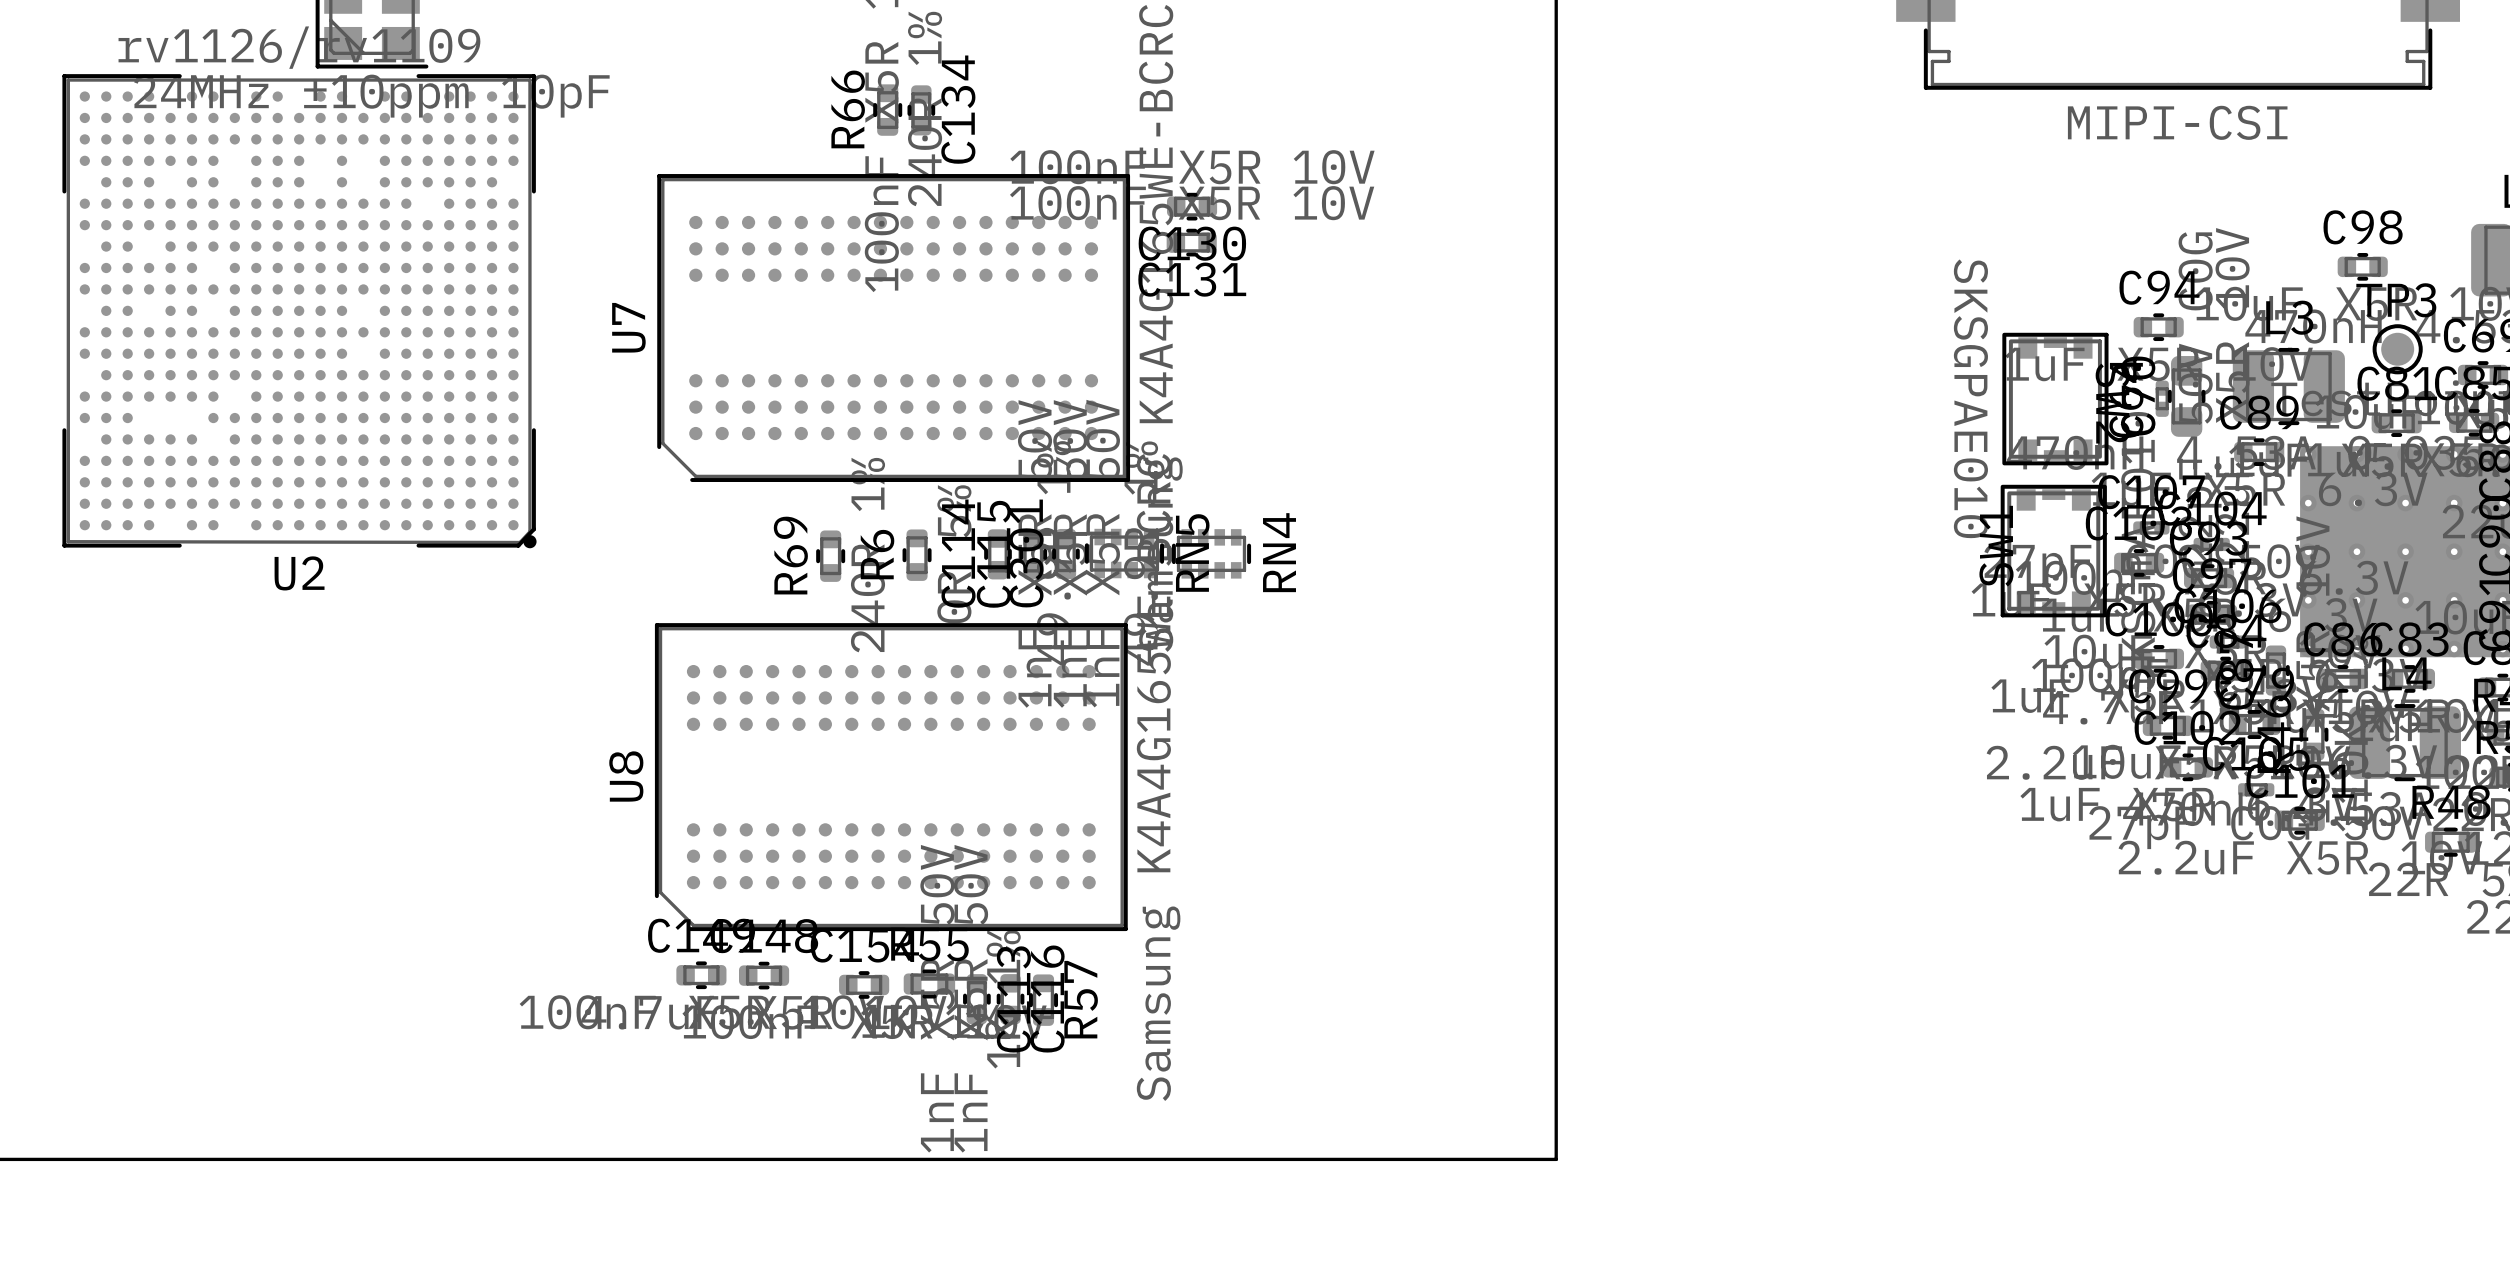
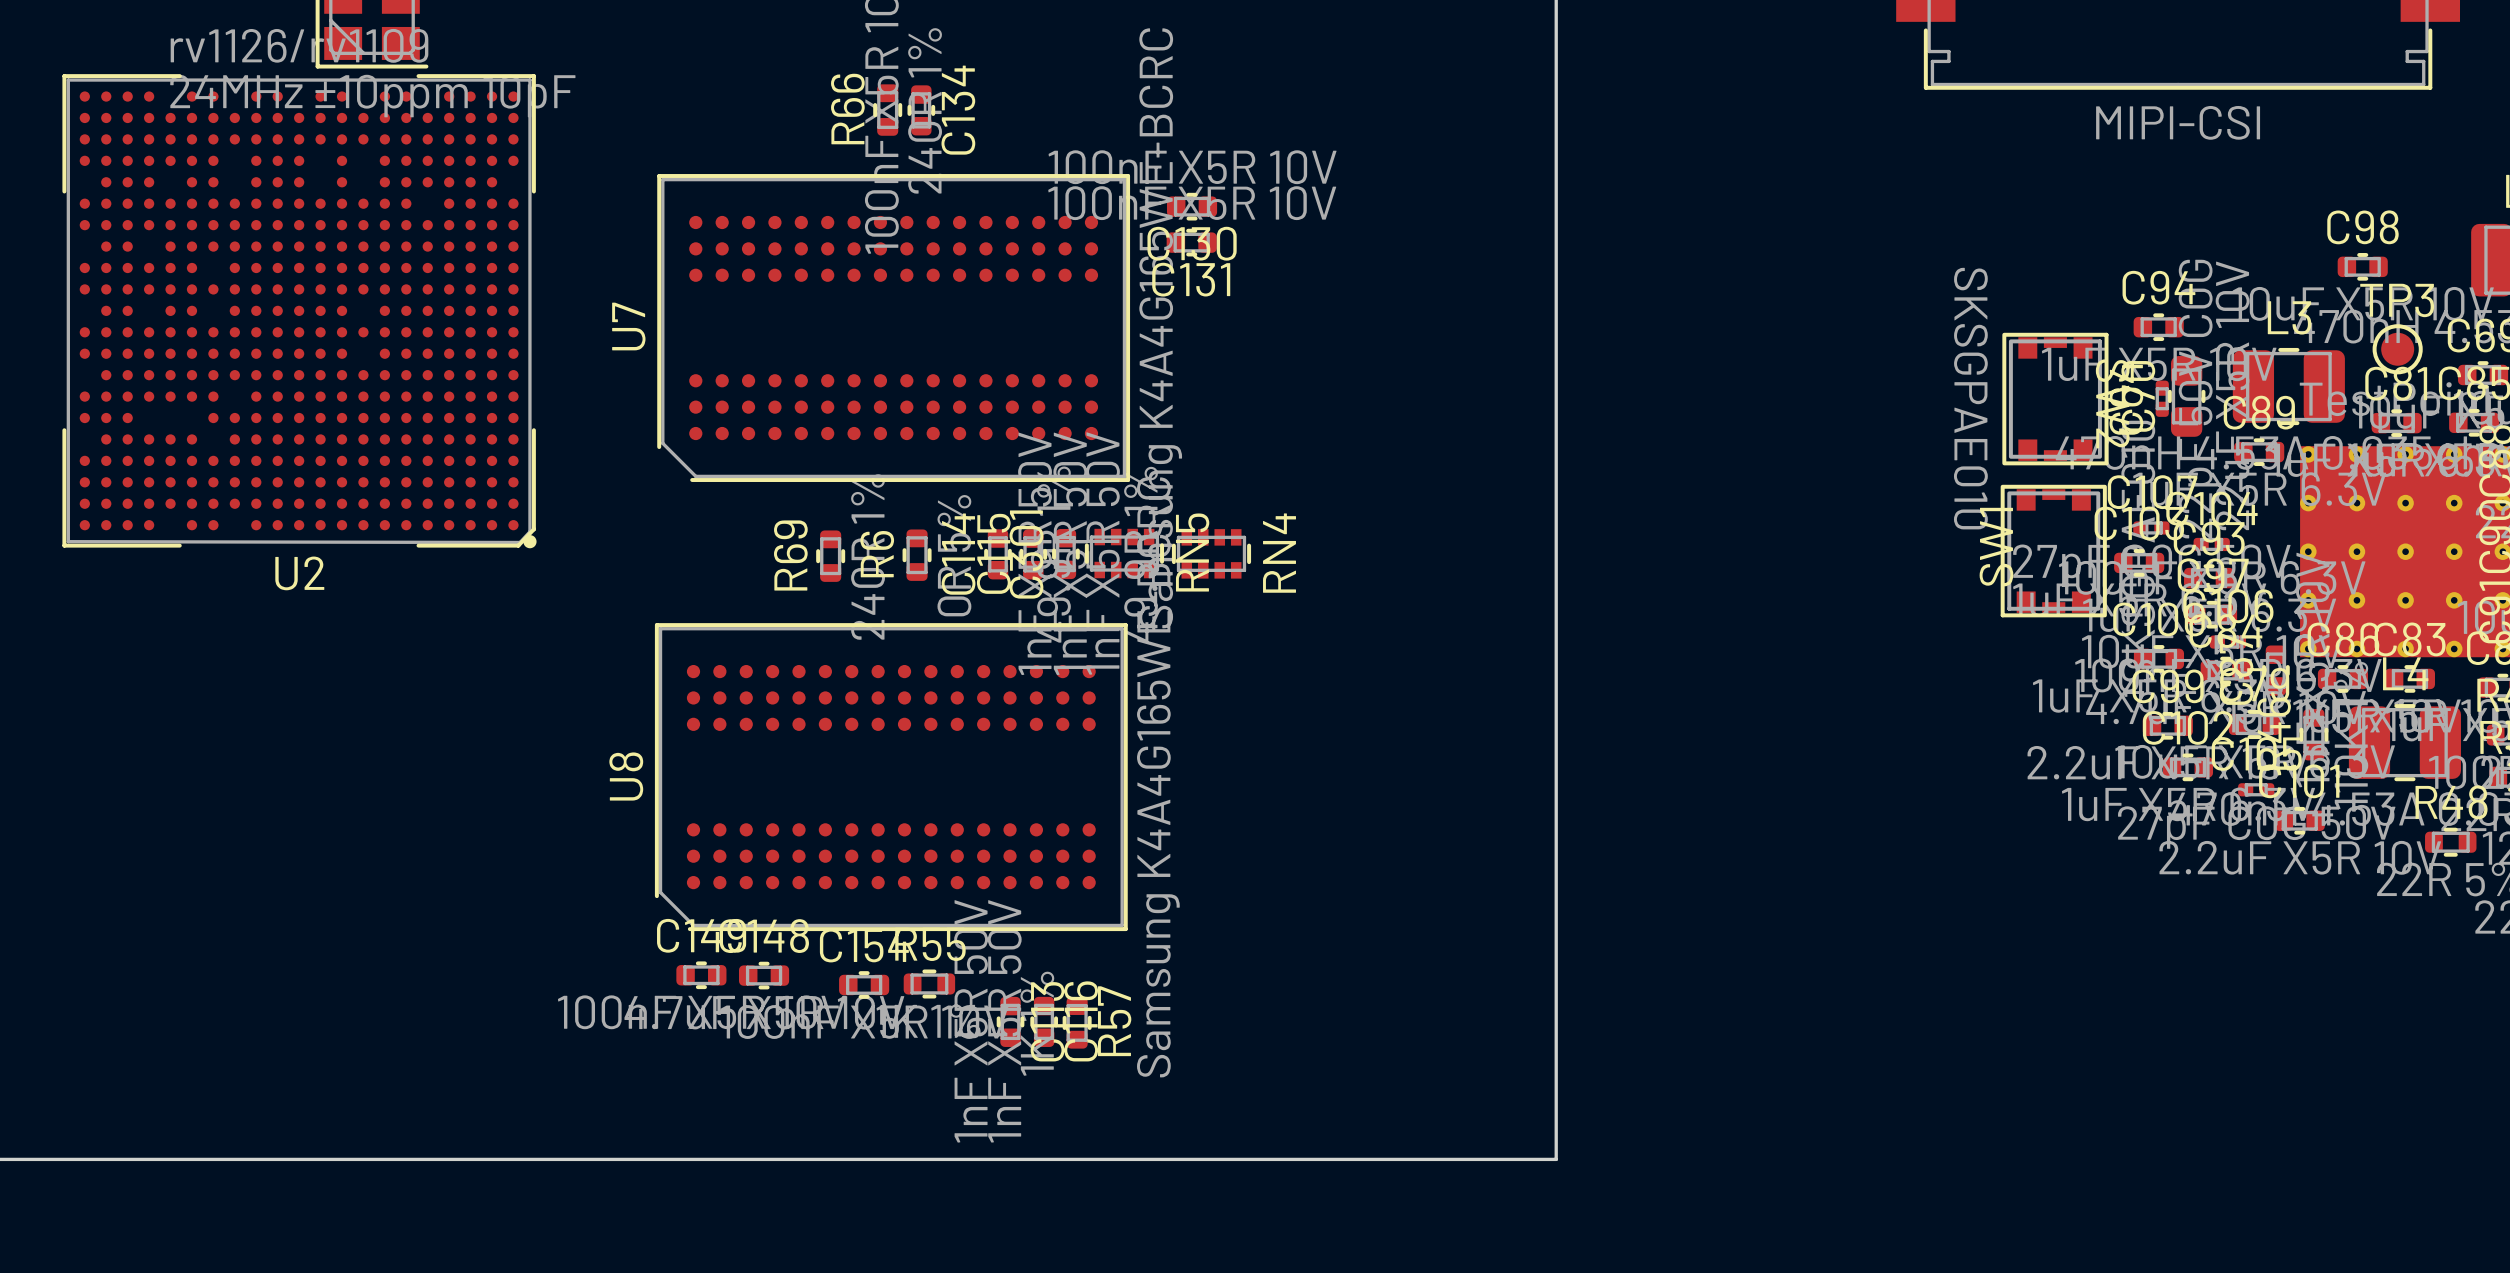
C113 position: (976, 999) -> (1010, 1021)
C116 position: (1010, 999) -> (1044, 1021)
R57 position: (1043, 1000) -> (1077, 1022)

